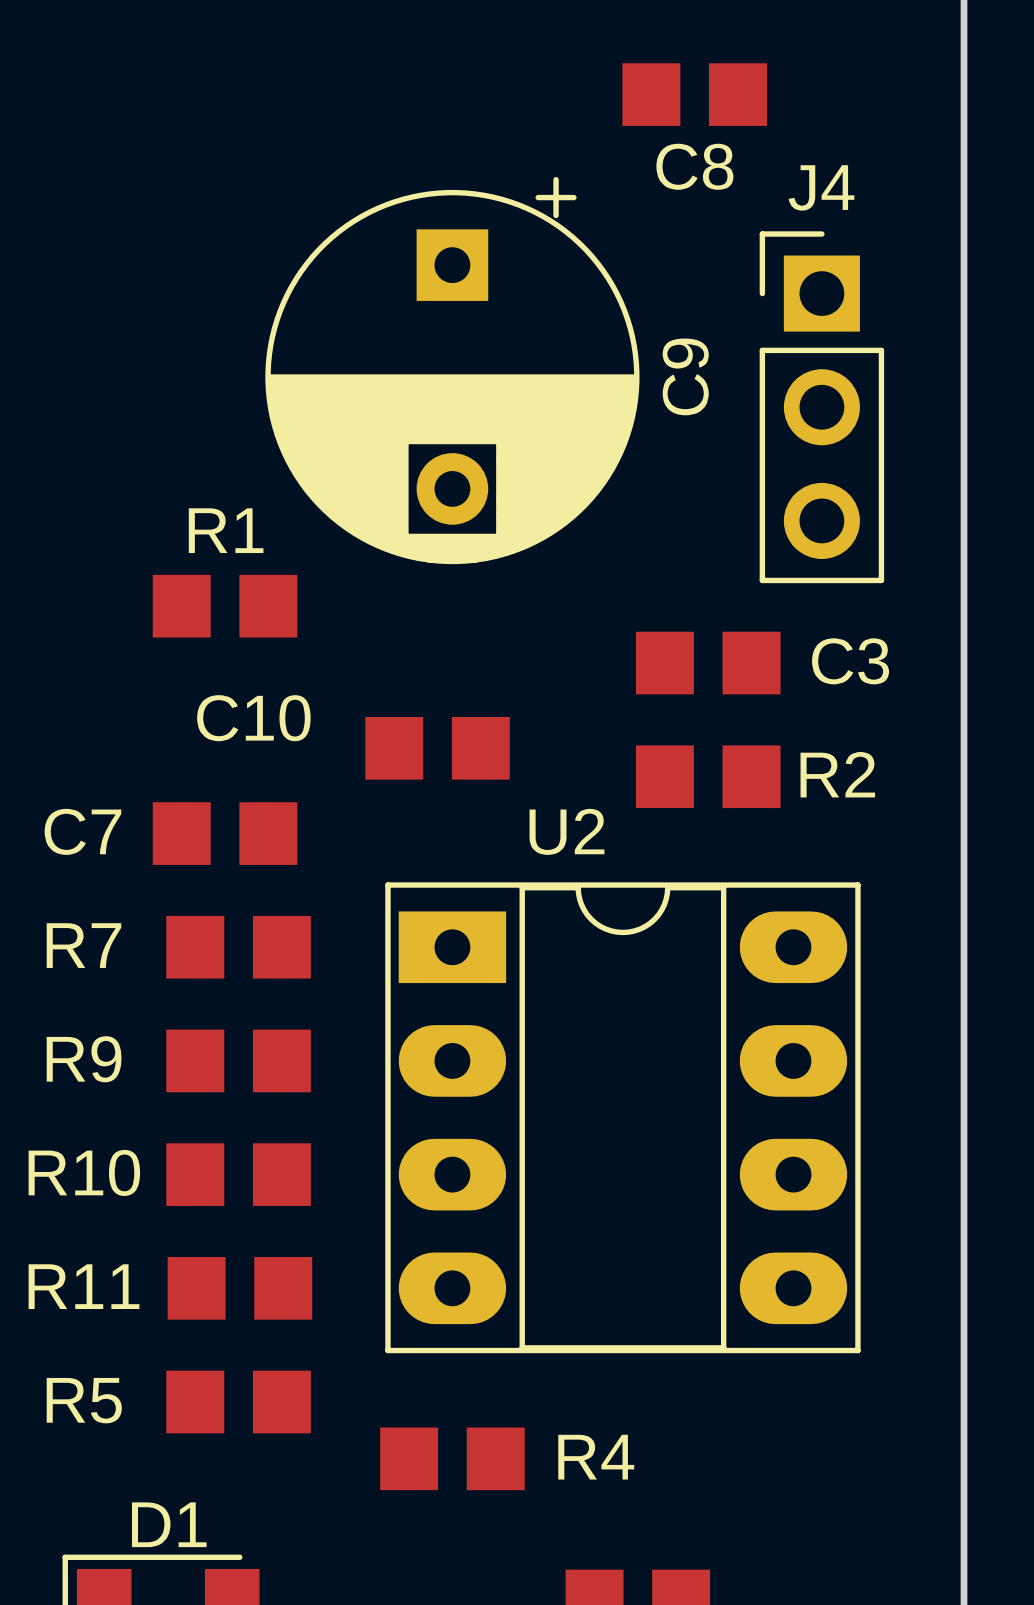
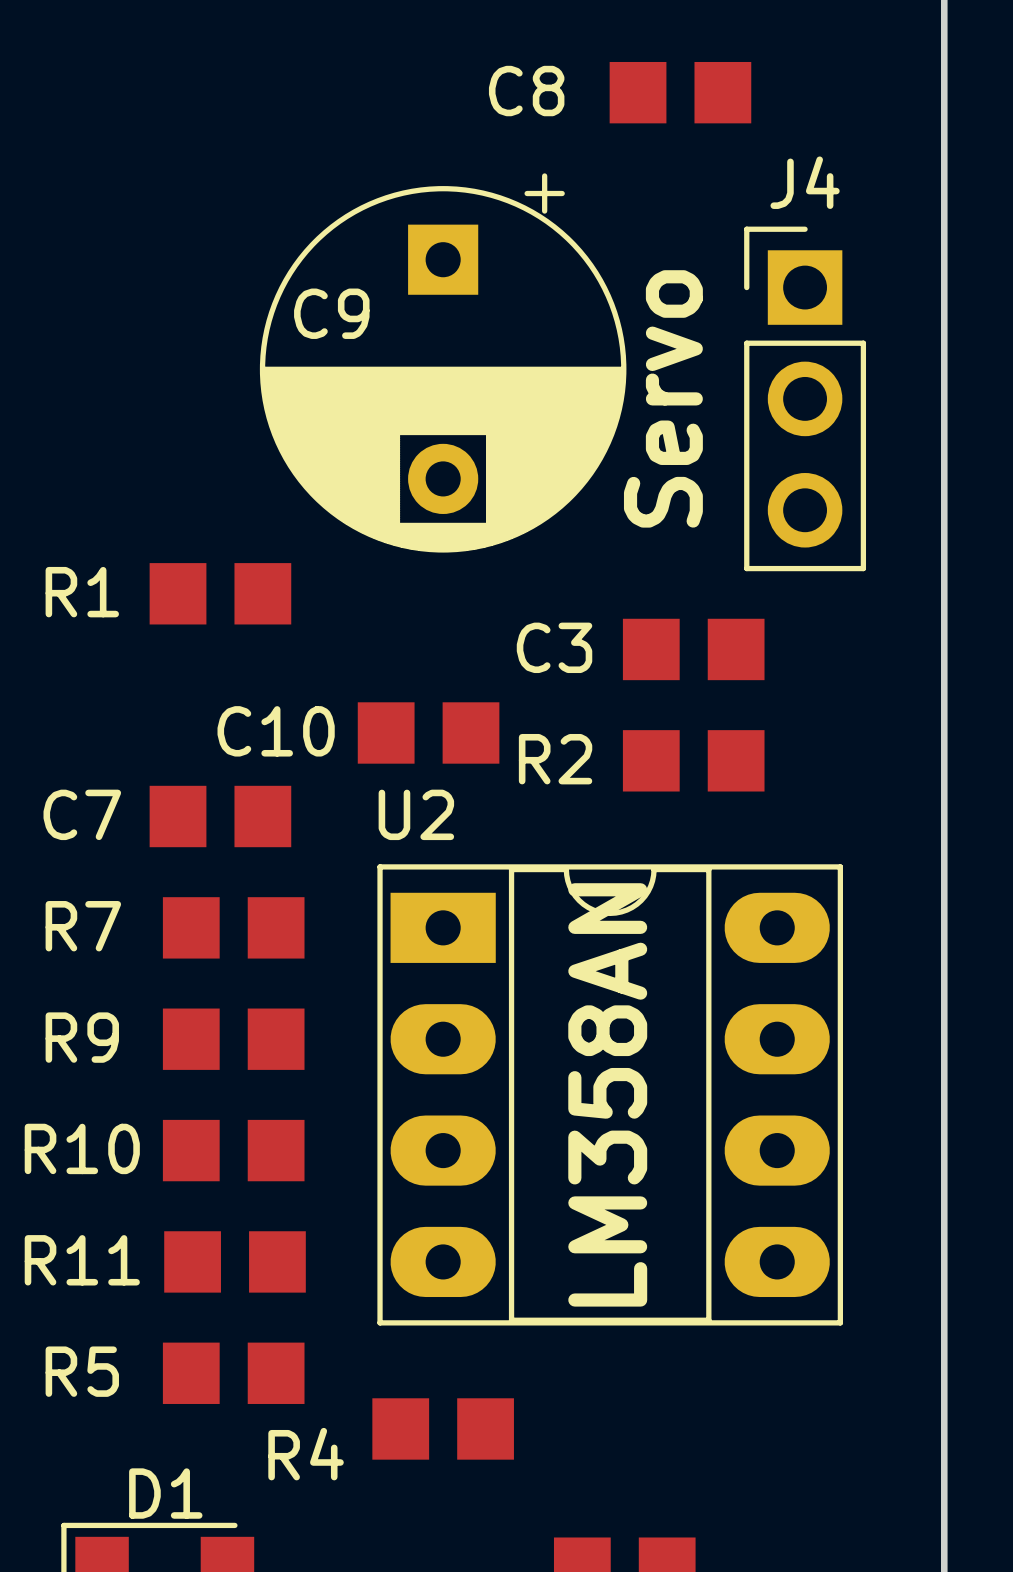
C8 name position: C8 (694, 166) -> C8 (526, 91)
C9 name rotation: 0° (685, 376) -> 90° clockwise (331, 313)
C9 name position: C9 (685, 376) -> C9 (331, 313)
text: none -> Servo (663, 398)
R1 name position: R1 (226, 530) -> R1 (82, 592)
C3 name position: C3 (850, 661) -> C3 (554, 647)
C10 name position: C10 (253, 718) -> C10 (276, 731)
R2 name position: R2 (837, 774) -> R2 (555, 759)
U2 name position: U2 (566, 831) -> U2 (416, 814)
text: none -> LM358AN (607, 1094)
R4 name position: R4 (596, 1457) -> R4 (306, 1454)

